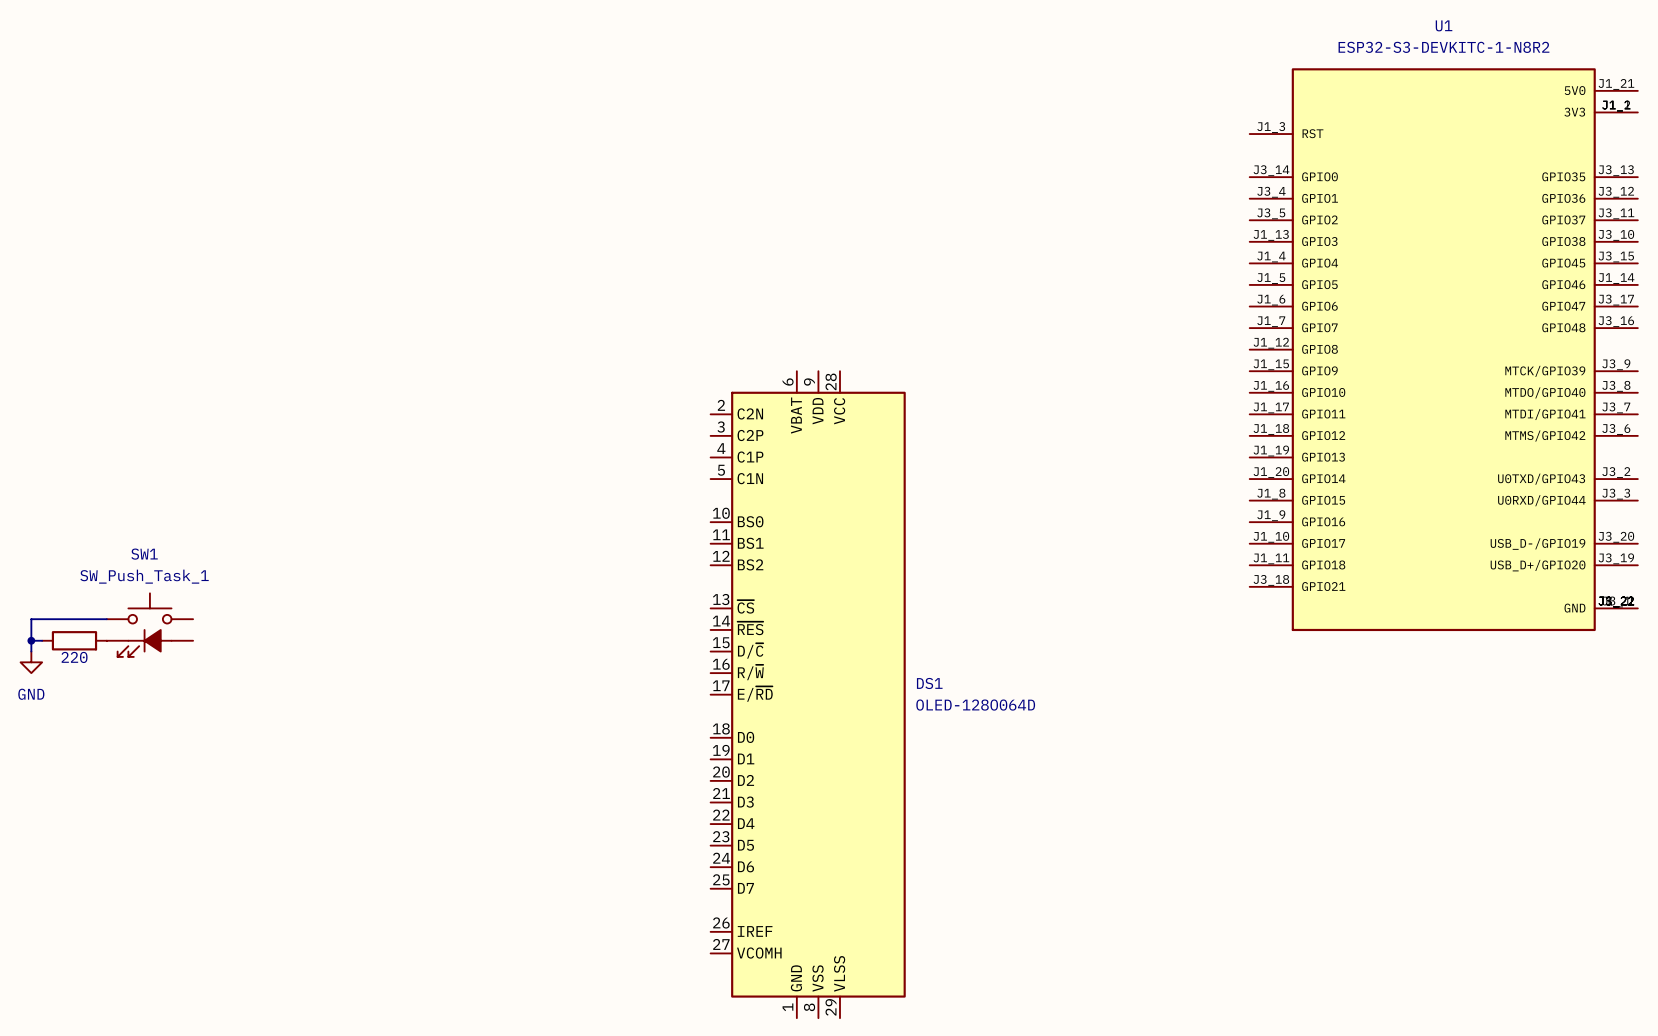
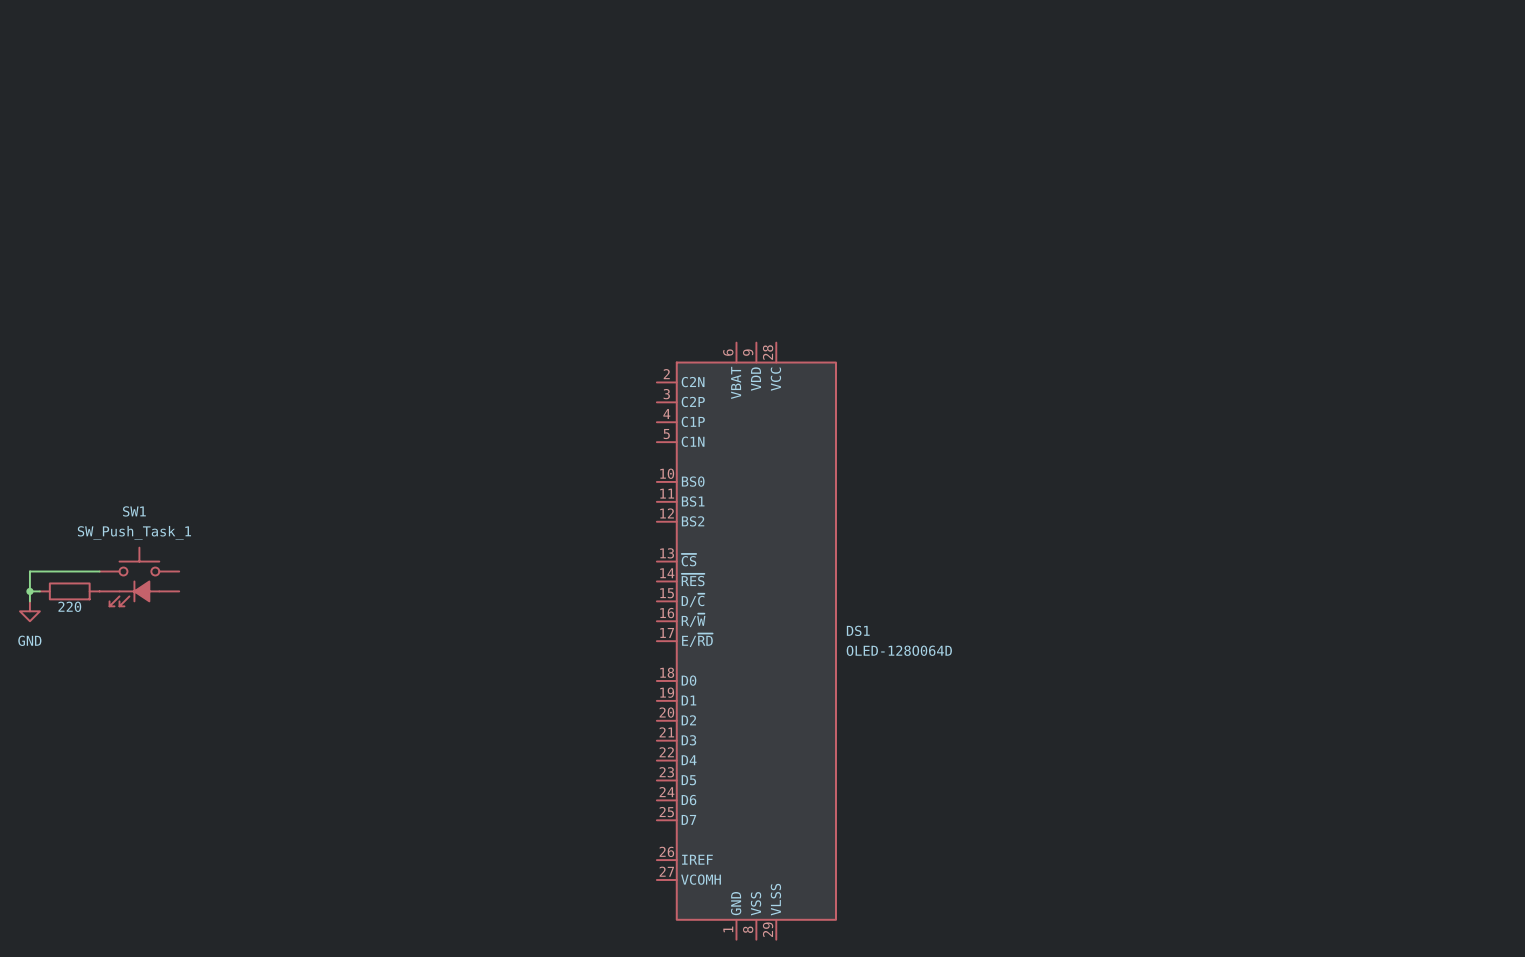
U1: ESP32-S3-DEVKITC-1-N8R2 (1443, 349) -> none

